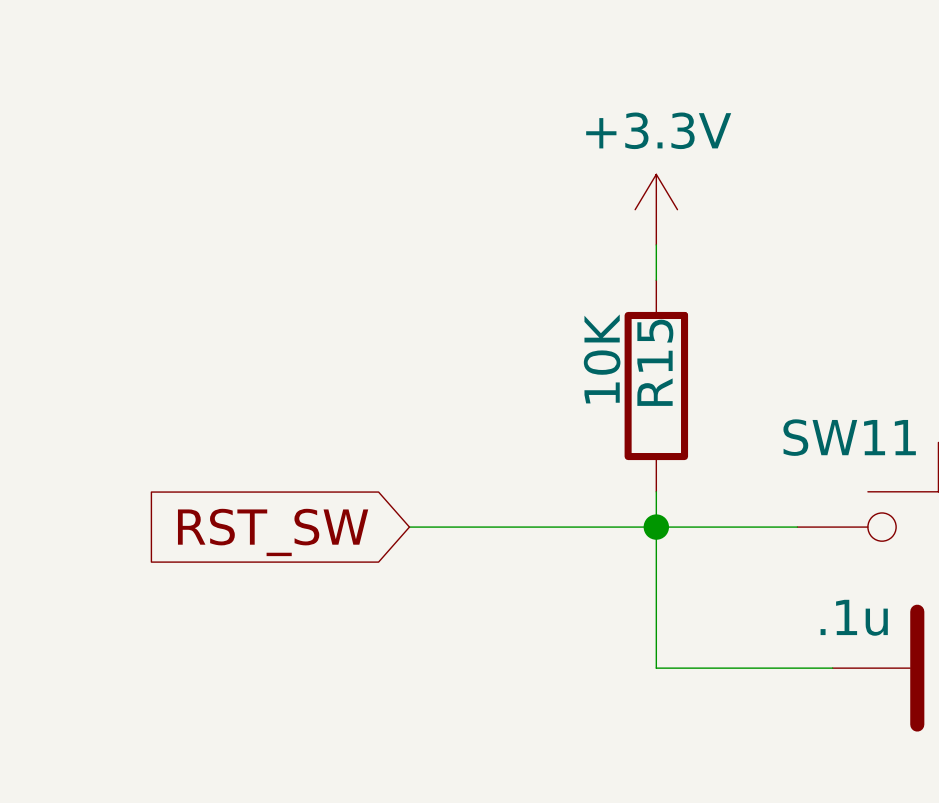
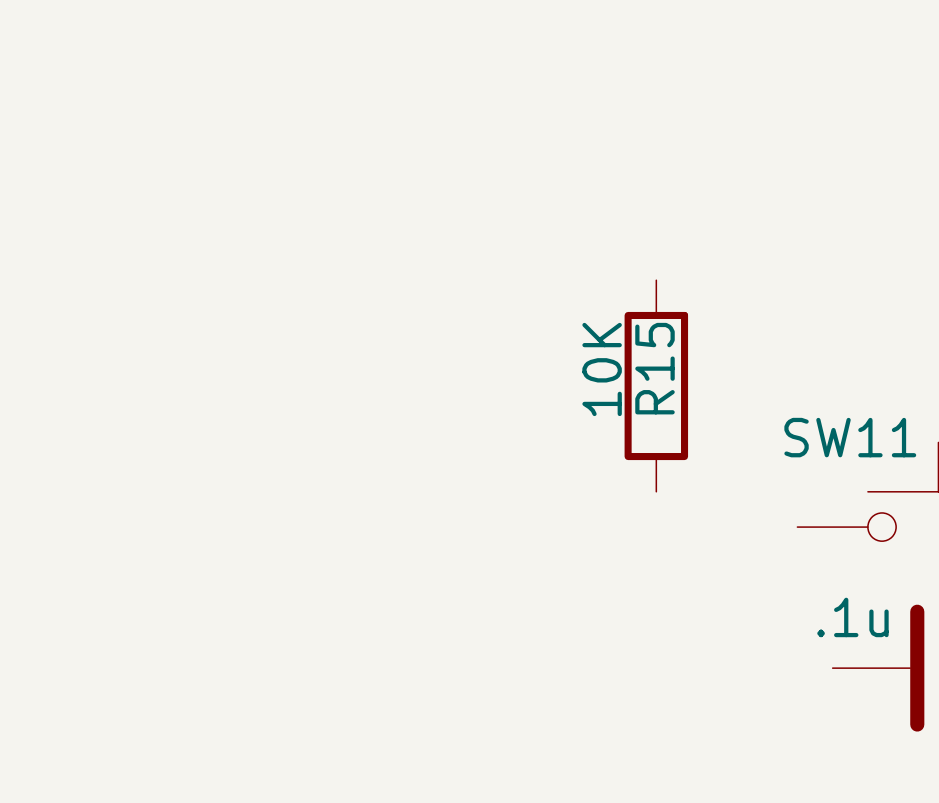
power symbol: +3.3V (656, 209) -> none
wire: (656, 244) (656, 280) -> none
wire: (656, 491) (656, 668) (832, 668) -> none
wire: (409, 527) (797, 527) -> none
junction: (656, 527) -> none
global label: RST_SW (273, 532) -> none

